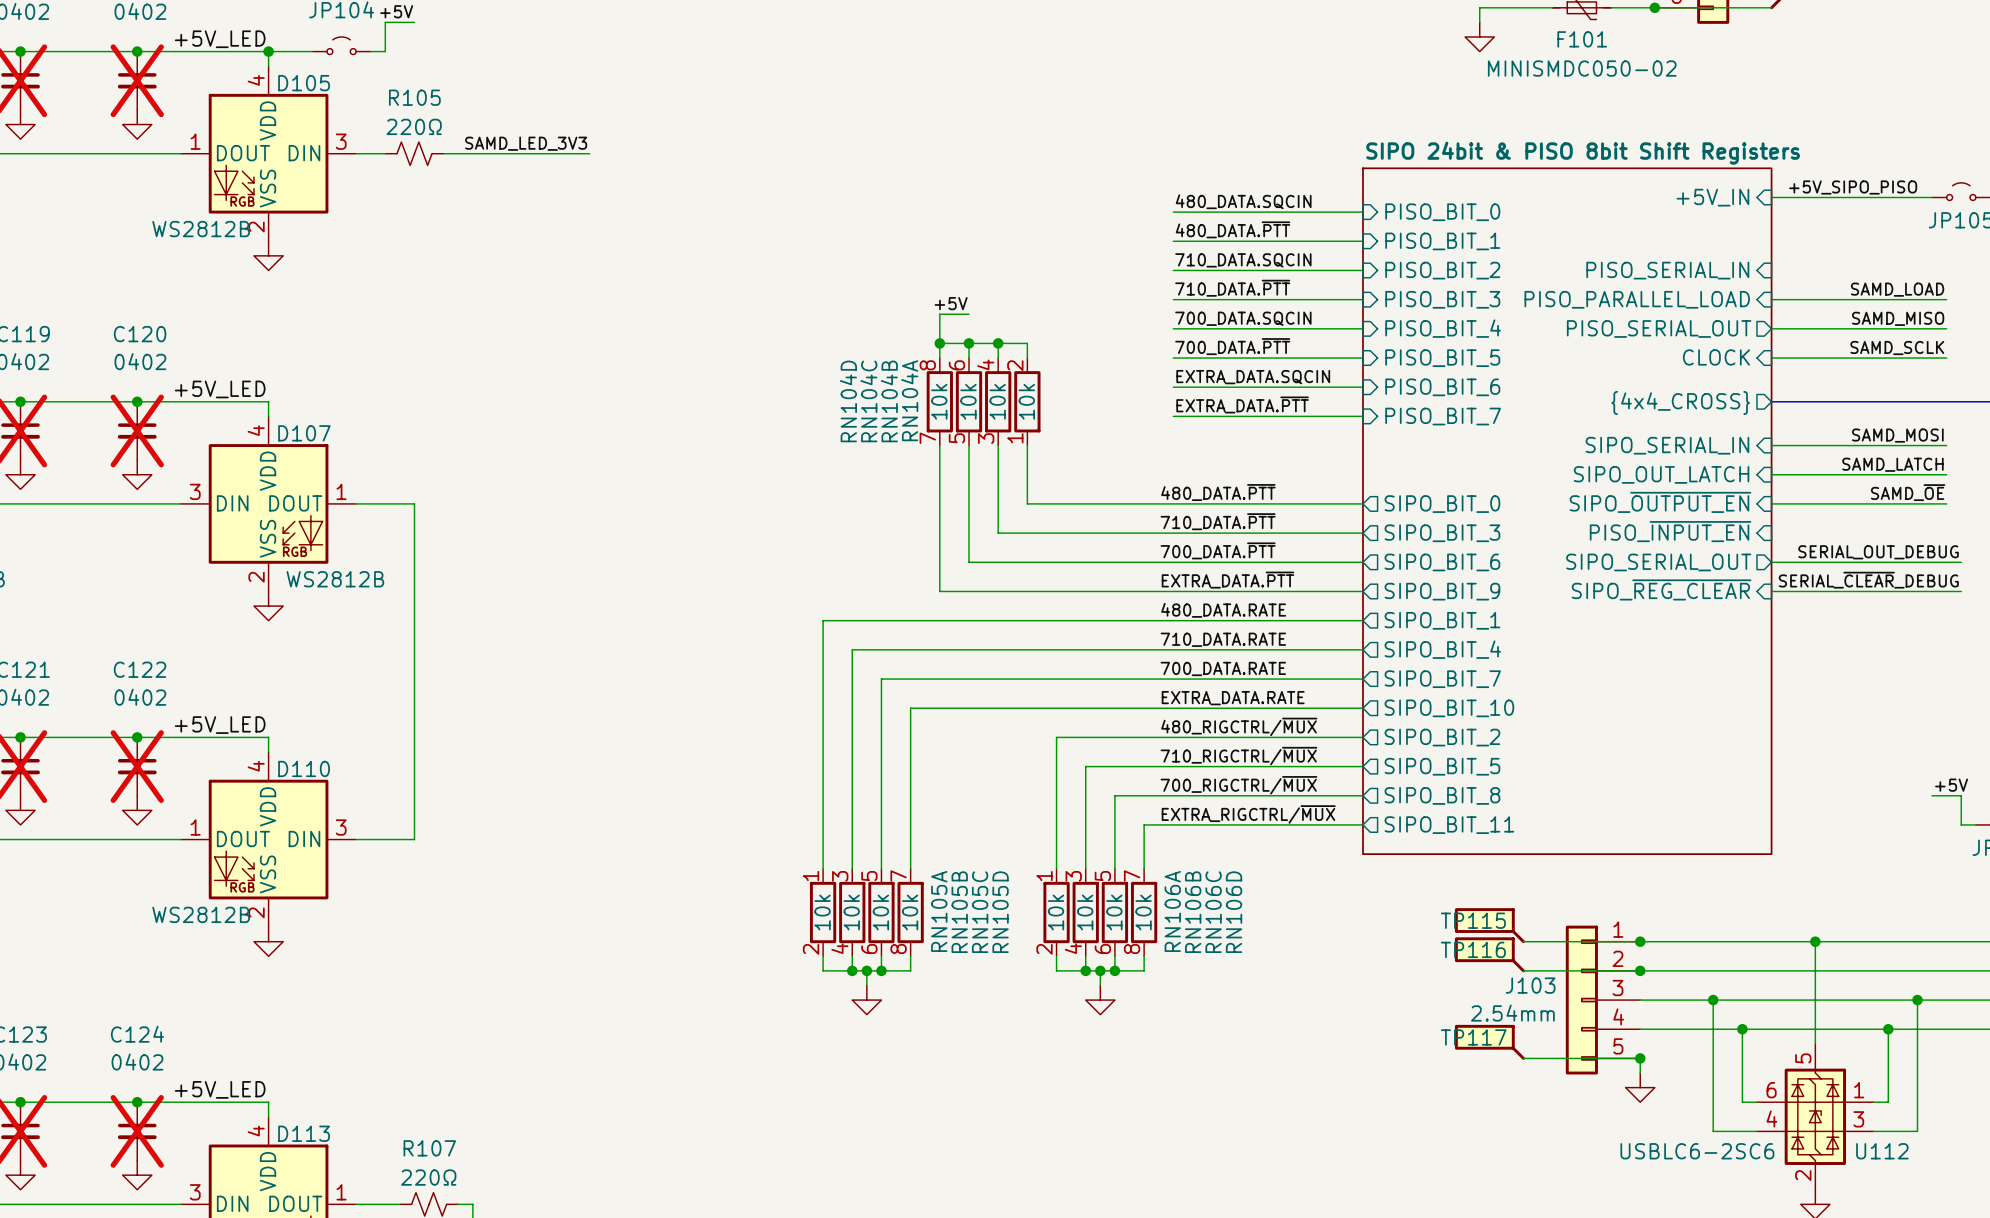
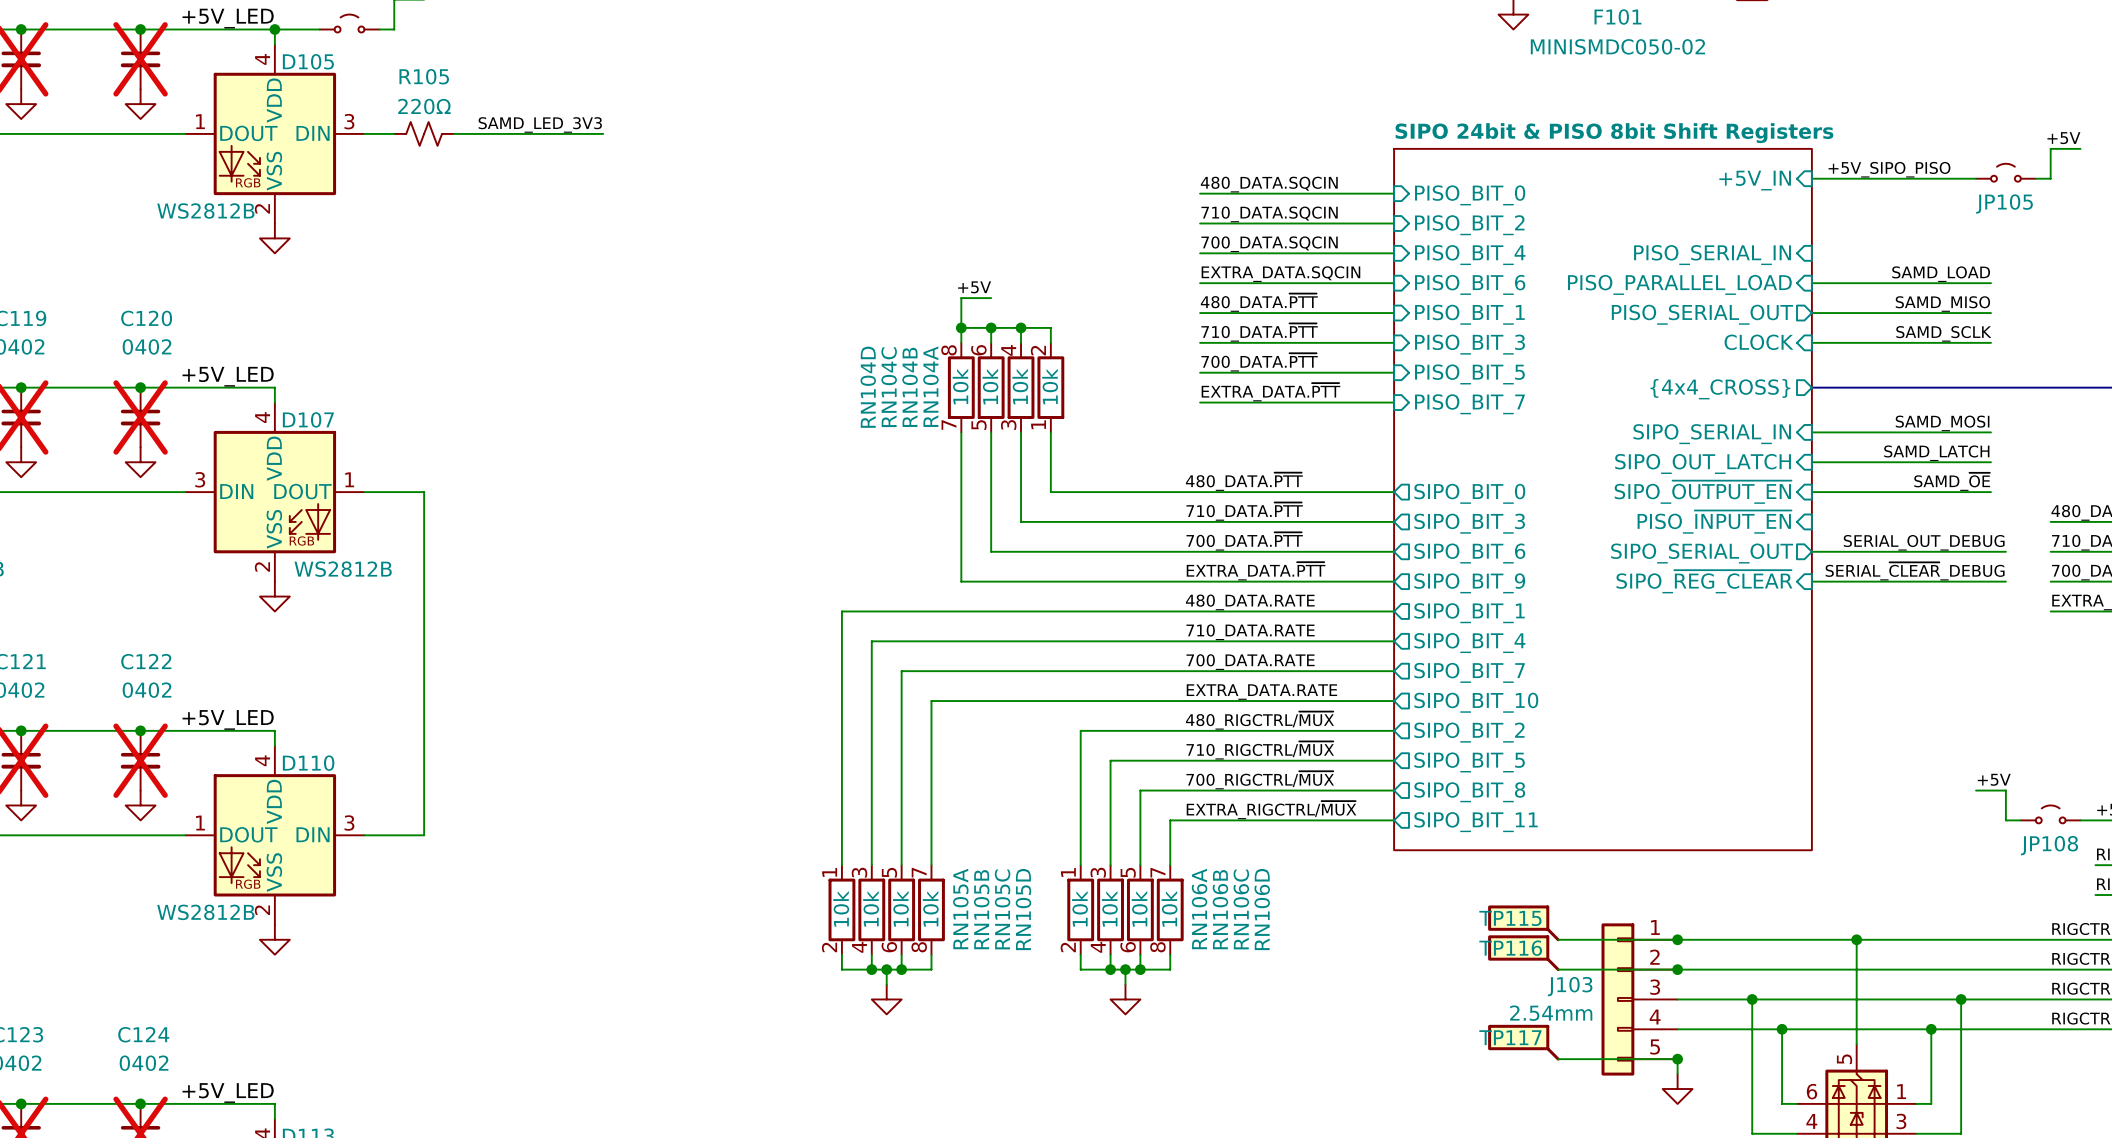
label: 480_DATA.~{PTT} (1232, 229) -> 710_DATA.SQCIN (1269, 214)
sheet pin: PISO_BIT_1 (1442, 241) -> PISO_BIT_2 (1469, 225)
label: 710_DATA.SQCIN (1243, 260) -> 700_DATA.SQCIN (1269, 244)
sheet pin: PISO_BIT_2 (1442, 270) -> PISO_BIT_4 (1470, 255)
label: 710_DATA.~{PTT} (1232, 288) -> EXTRA_DATA.SQCIN (1280, 274)
sheet pin: PISO_BIT_3 (1442, 299) -> PISO_BIT_6 (1470, 284)
label: 700_DATA.SQCIN (1243, 318) -> 480_DATA.~{PTT} (1259, 302)
sheet pin: PISO_BIT_4 (1443, 328) -> PISO_BIT_1 (1469, 314)
label: 700_DATA.~{PTT} (1232, 346) -> 710_DATA.~{PTT} (1259, 332)
sheet pin: PISO_BIT_5 (1442, 358) -> PISO_BIT_3 (1469, 344)
label: EXTRA_DATA.SQCIN (1253, 377) -> 700_DATA.~{PTT} (1259, 362)
sheet pin: PISO_BIT_6 (1442, 387) -> PISO_BIT_5 (1469, 374)

